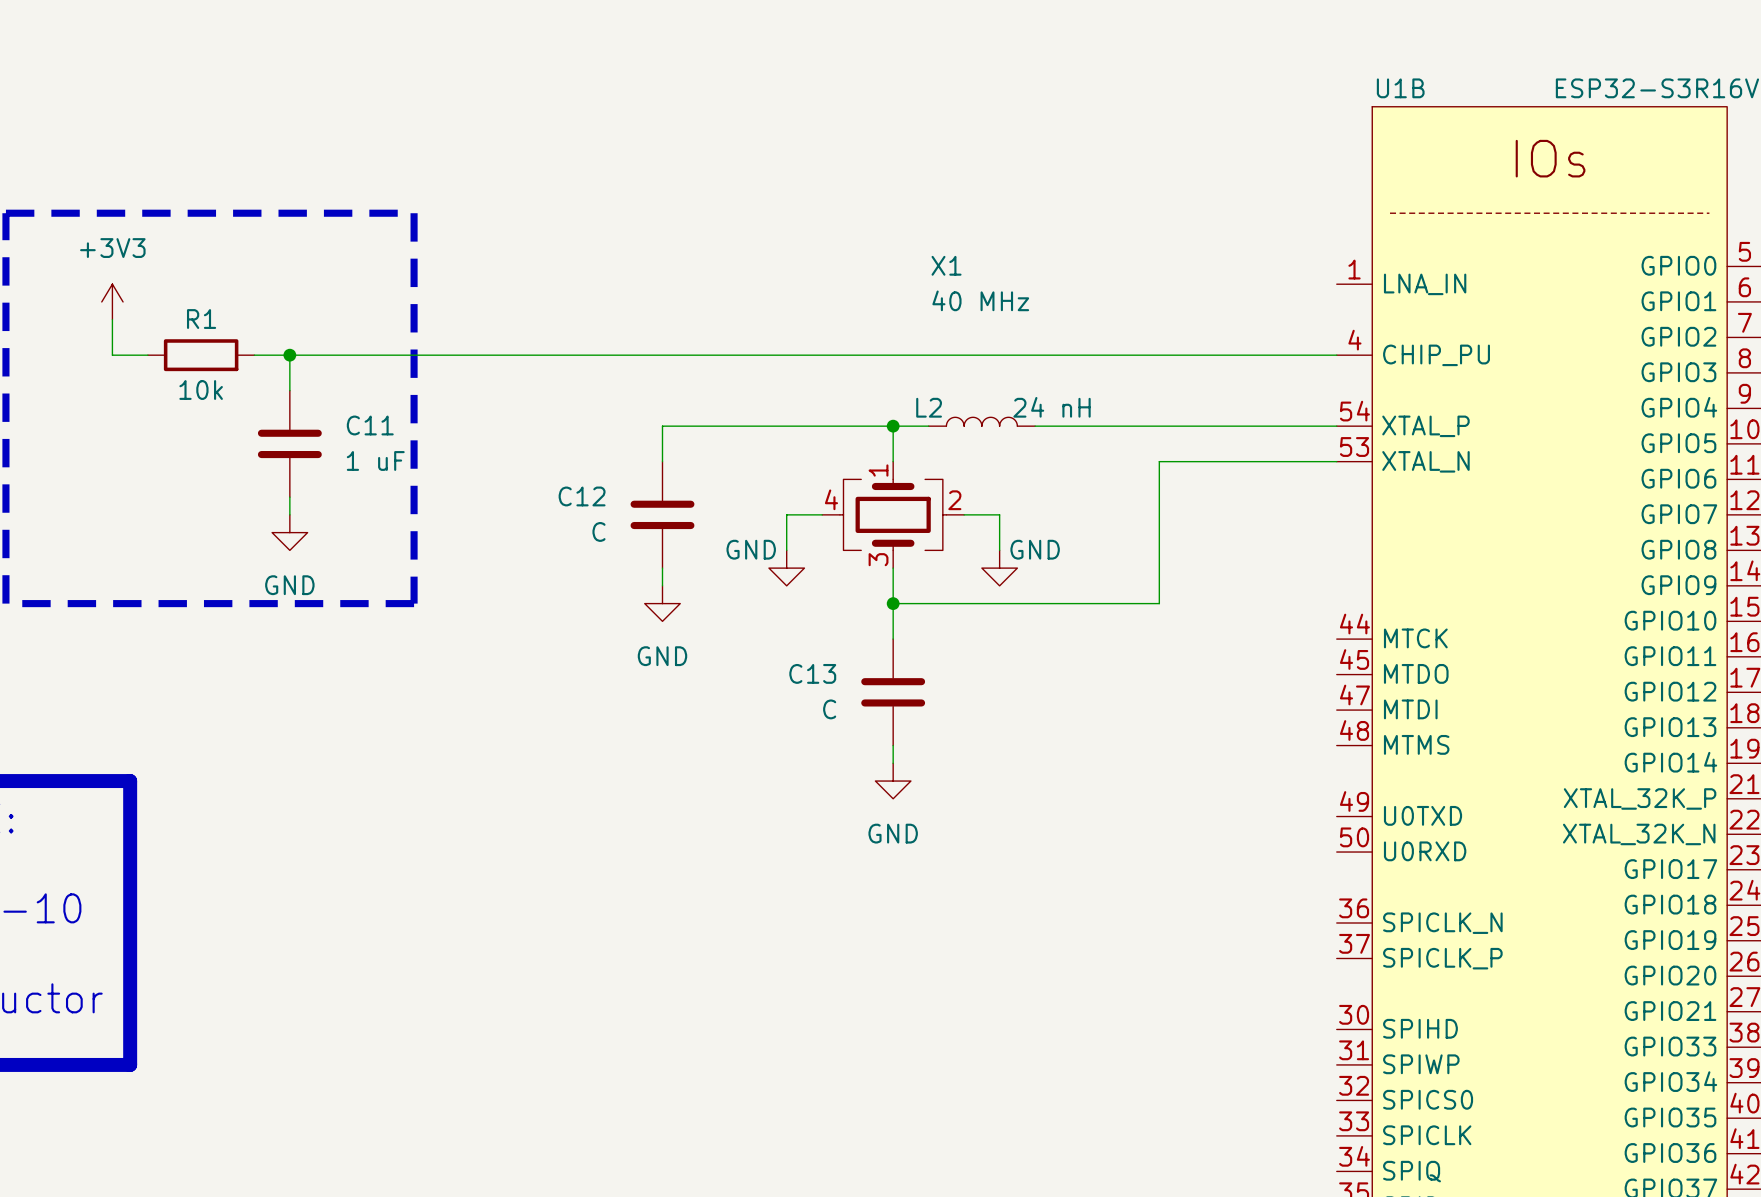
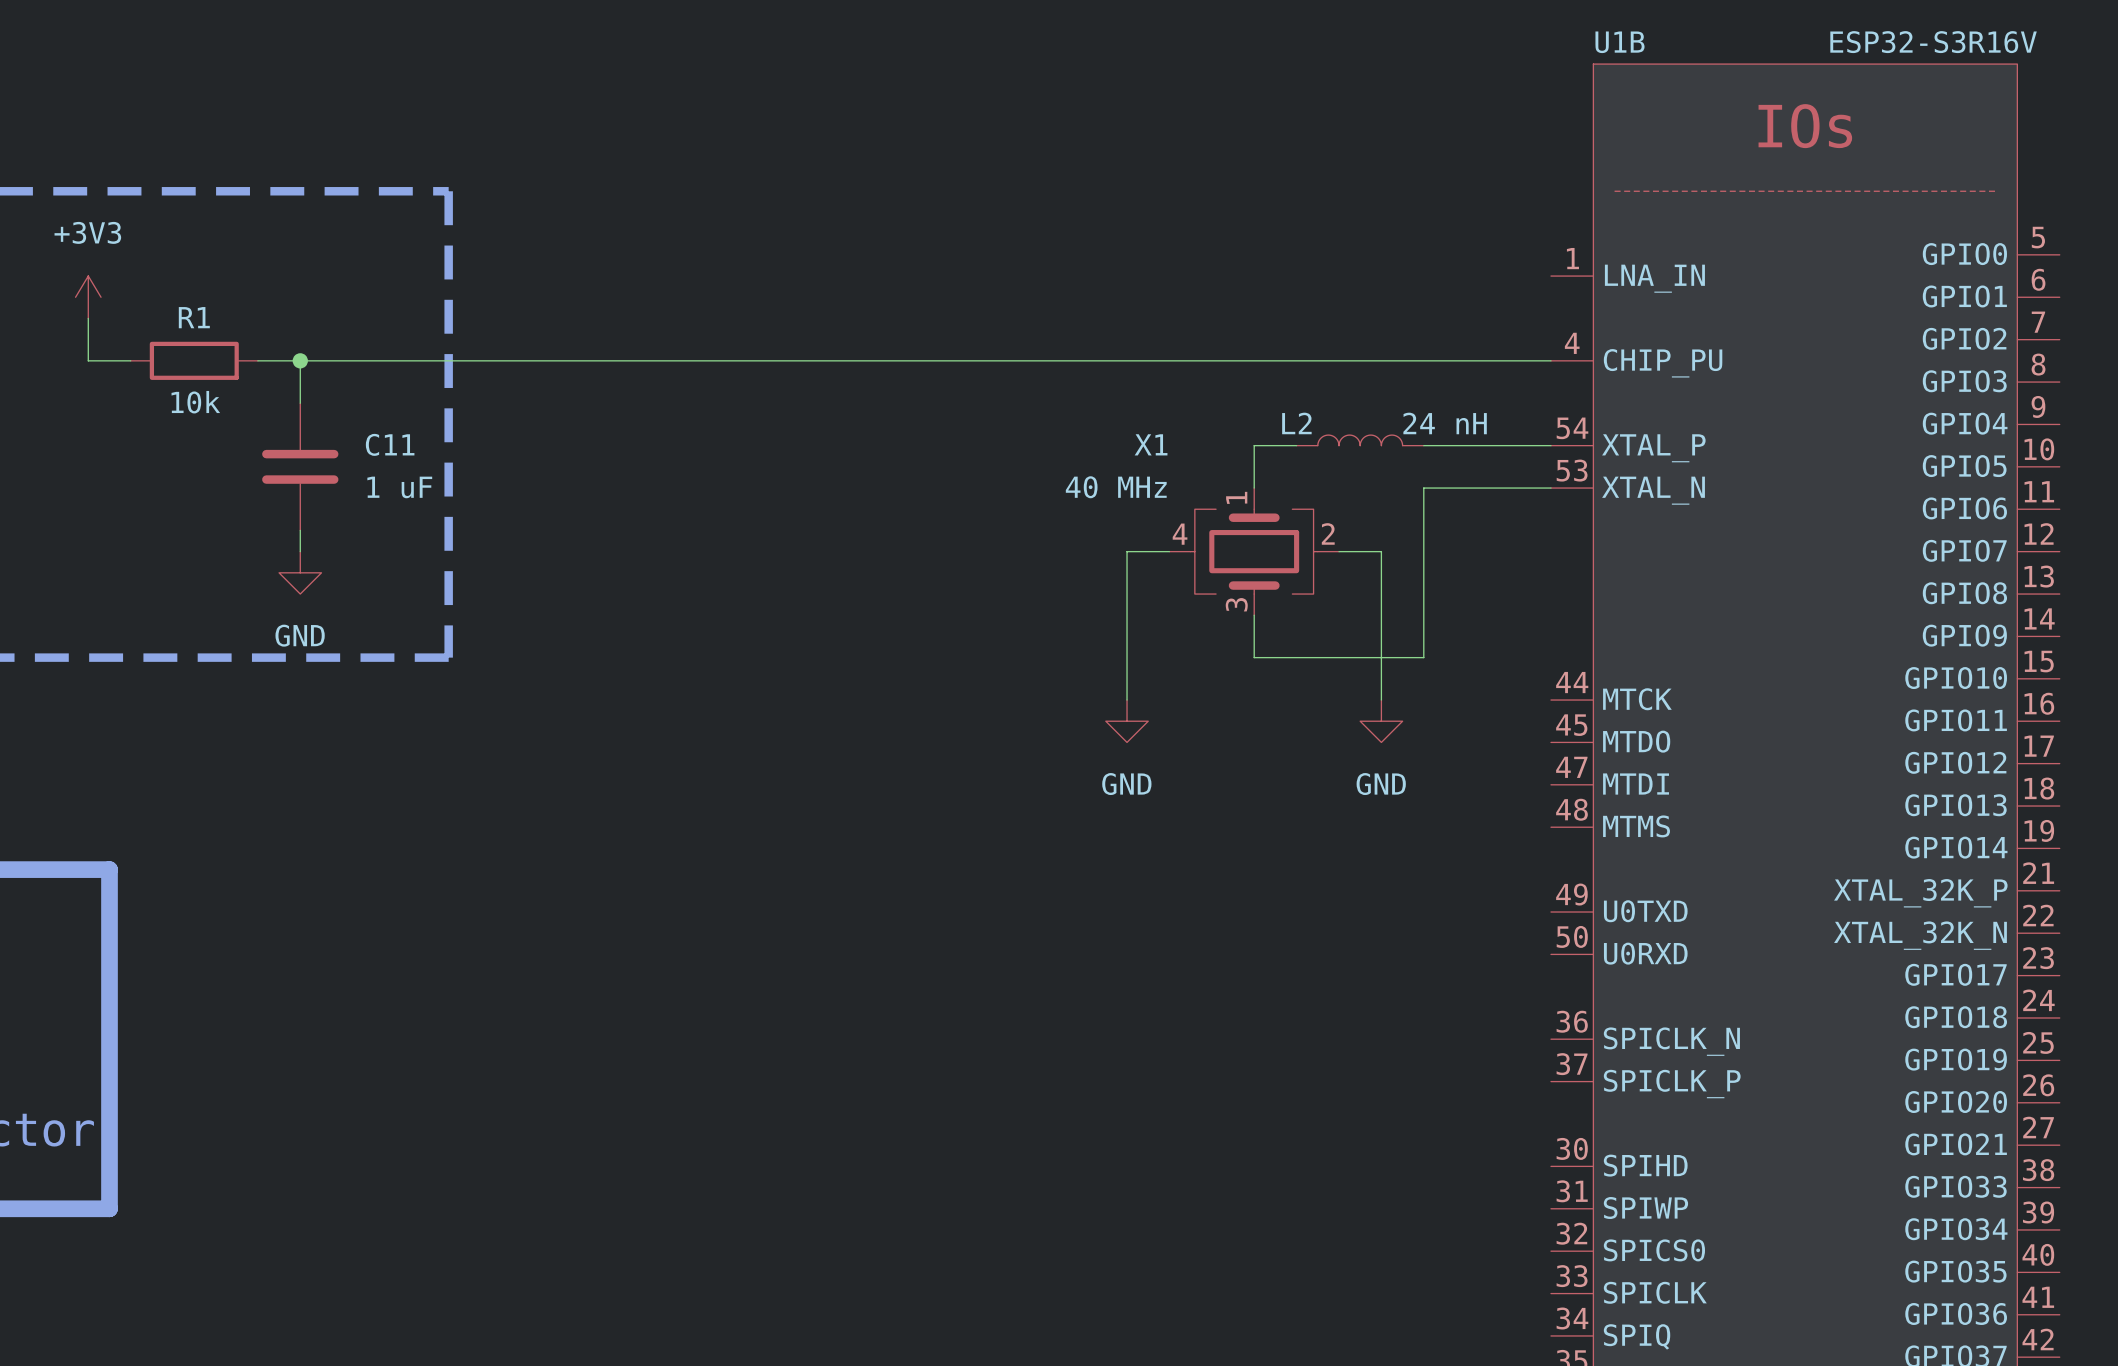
X1 name position: X1 (946, 265) -> X1 (1151, 444)
X1 value position: 40 MHz (980, 300) -> 40 MHz (1116, 487)
L2 position: (981, 421) -> (1360, 440)
wire: (893, 426) (893, 461) -> none
junction: (893, 426) -> none
wire: (928, 426) (662, 426) (662, 461) -> none
wire: (1035, 426) (1088, 426) -> (1254, 488) (1254, 445)
wire: (1123, 426) (1230, 426) -> none
wire: (1230, 461) (1159, 461) (1159, 603) -> (1423, 488) (1423, 657) (1339, 657)
C12: C (662, 514) -> none
wire: (822, 514) (786, 514) (786, 550) -> none
X1 position: (893, 514) -> (1254, 551)
wire: (964, 514) (981, 514) -> (1127, 700) (1127, 551)
wire: (999, 514) (999, 550) -> (1148, 551) (1169, 551)
wire: none -> (1339, 551) (1381, 551) (1381, 700)
wire: (662, 568) (662, 585) -> none
power symbol: GND (786, 568) -> none
wire: (893, 568) (893, 639) -> none
power symbol: GND (999, 568) -> none
power symbol: GND (662, 603) -> none
wire: (893, 603) (1088, 603) -> (1254, 615) (1254, 657)
junction: (893, 603) -> none
power symbol: none -> GND (1127, 721)
power symbol: none -> GND (1381, 721)
C13: C (893, 692) -> none
wire: (893, 745) (893, 763) -> none
power symbol: GND (893, 781) -> none

